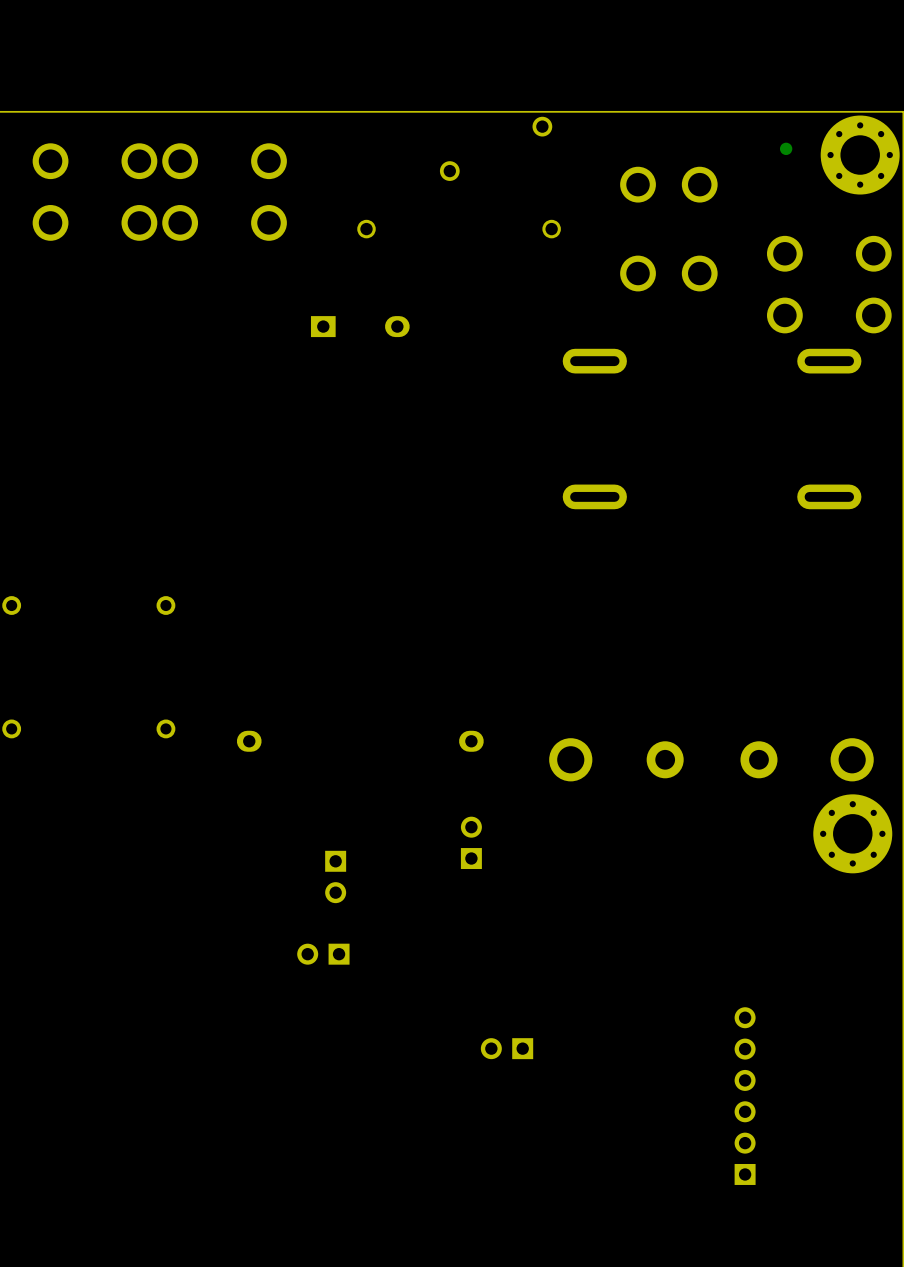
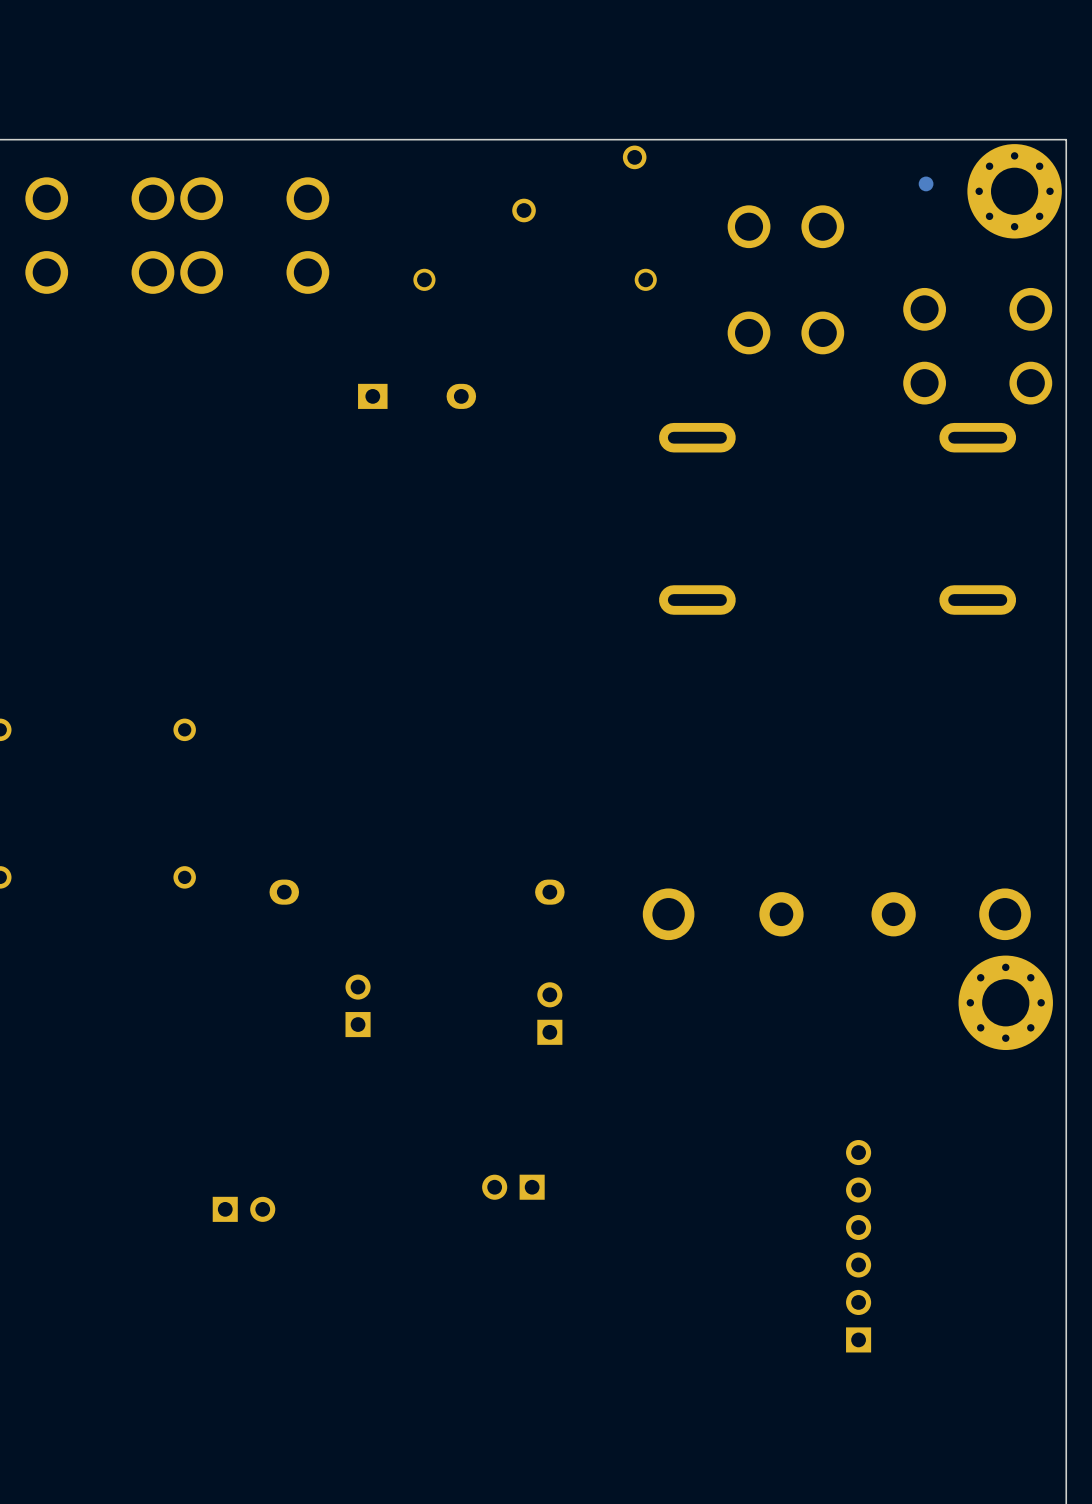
part rotation: 0° (335, 876) -> 180° (358, 1005)
part position: (335, 876) -> (358, 1005)
part: (323, 954) -> none
part: none -> (513, 1187)
part: none -> (243, 1209)
part: (507, 1048) -> none
part position: (745, 1096) -> (858, 1246)

